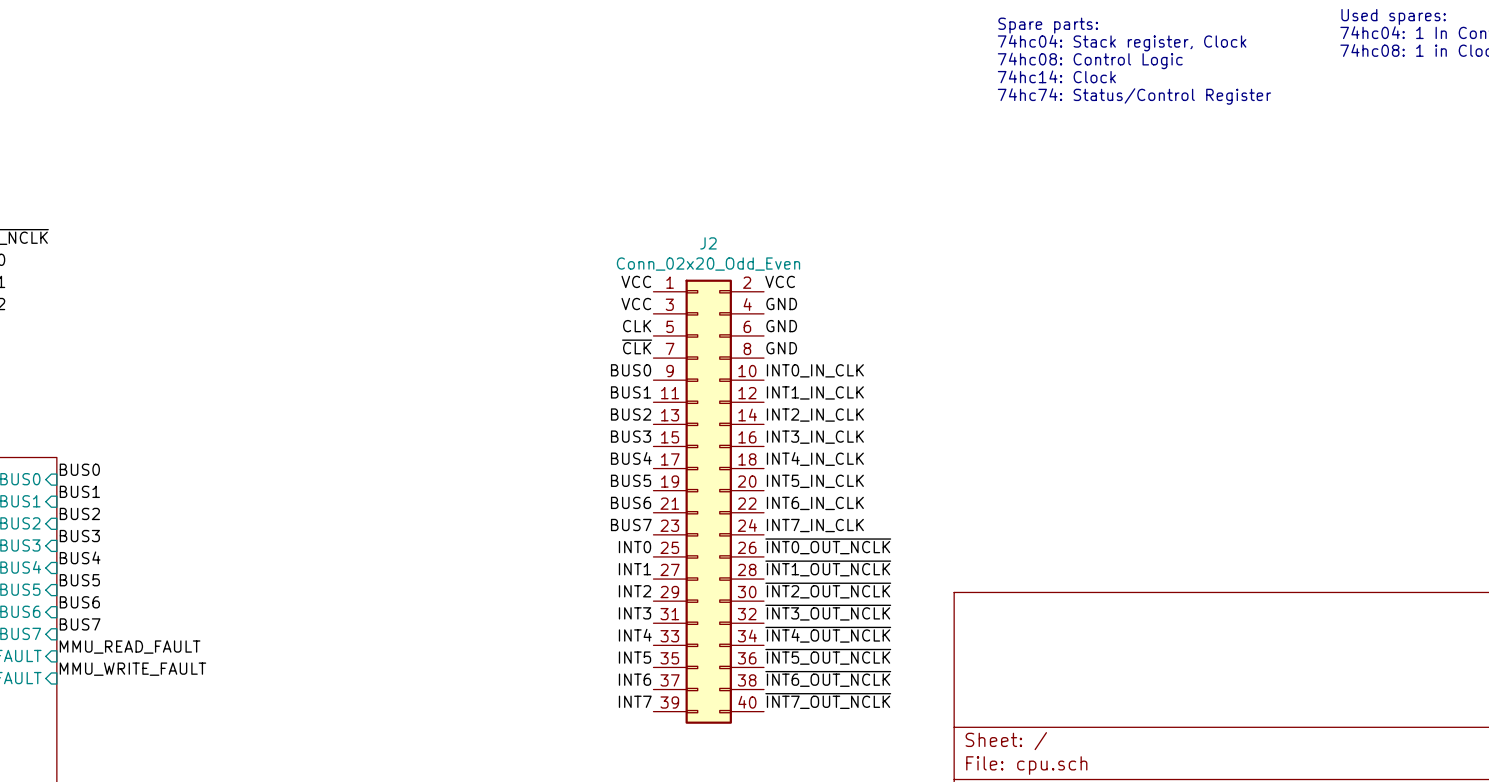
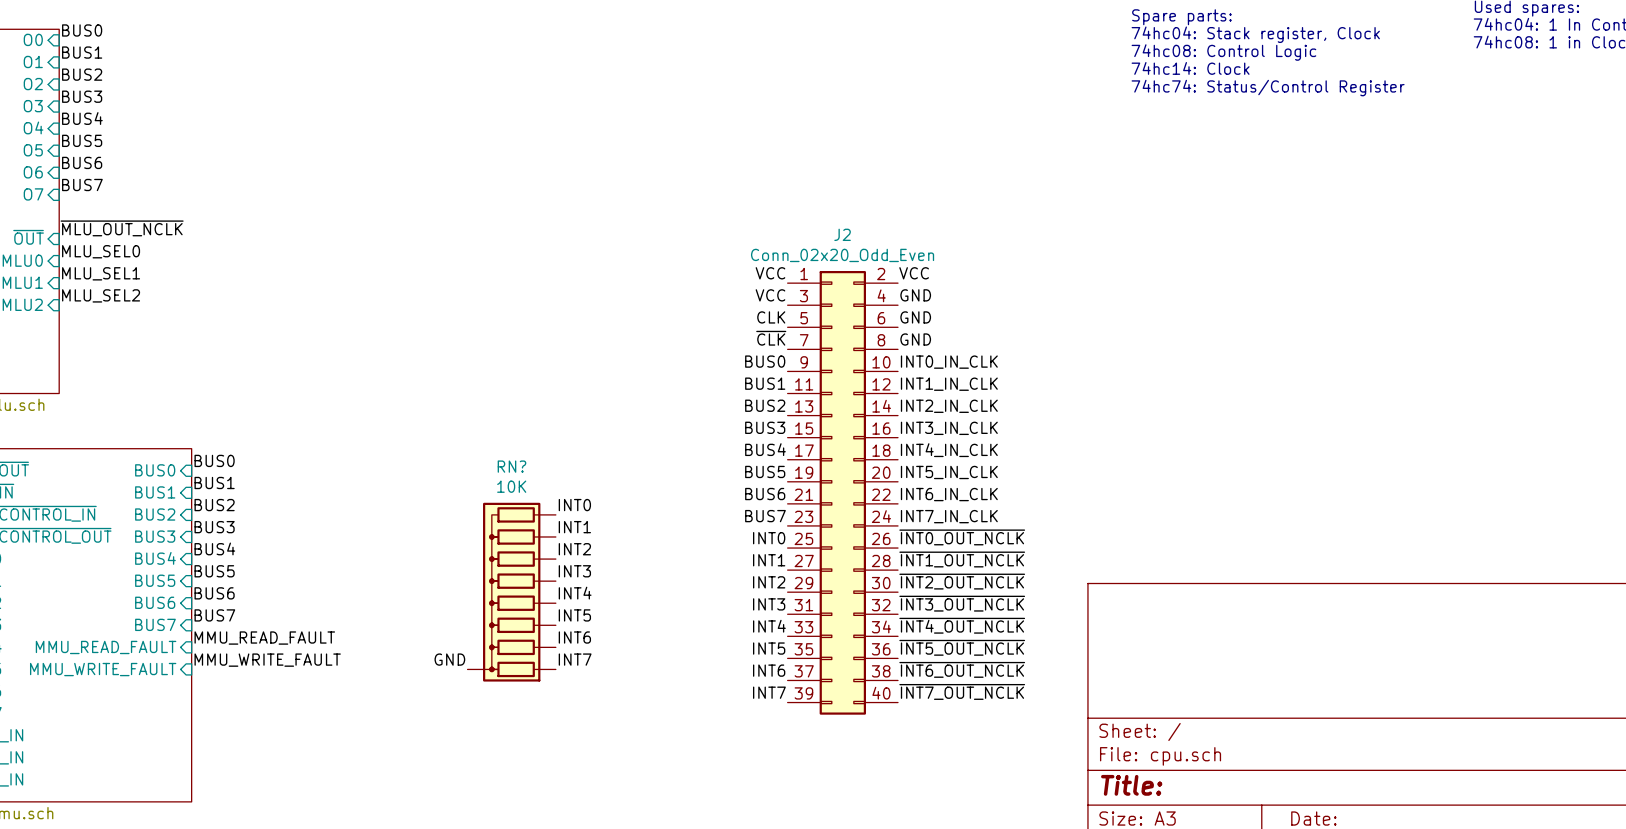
label: none -> INT0 (574, 505)
label: none -> INT1 (574, 527)
label: none -> INT2 (574, 549)
label: none -> INT3 (574, 571)
RN?: none -> 10K (511, 592)
label: none -> INT4 (575, 593)
label: none -> INT5 (574, 615)
label: none -> INT6 (574, 637)
label: none -> GND (449, 659)
label: none -> INT7 (575, 659)

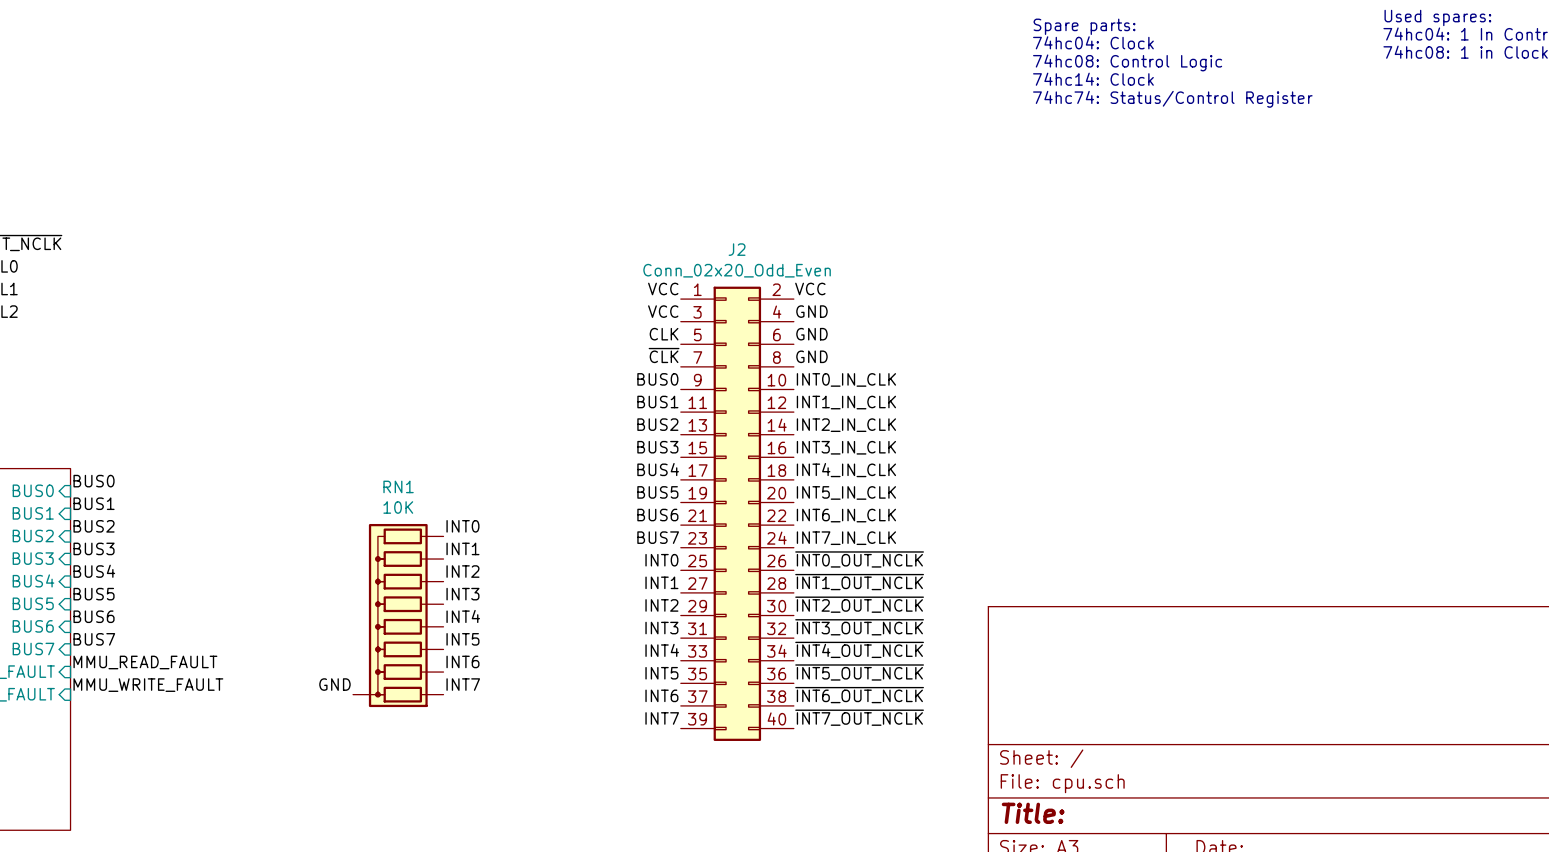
text: 74hc04: Stack register, Clock (1255, 34) -> 74hc04: Clock (1093, 42)
RN? name: RN? (511, 466) -> RN1 (398, 486)

